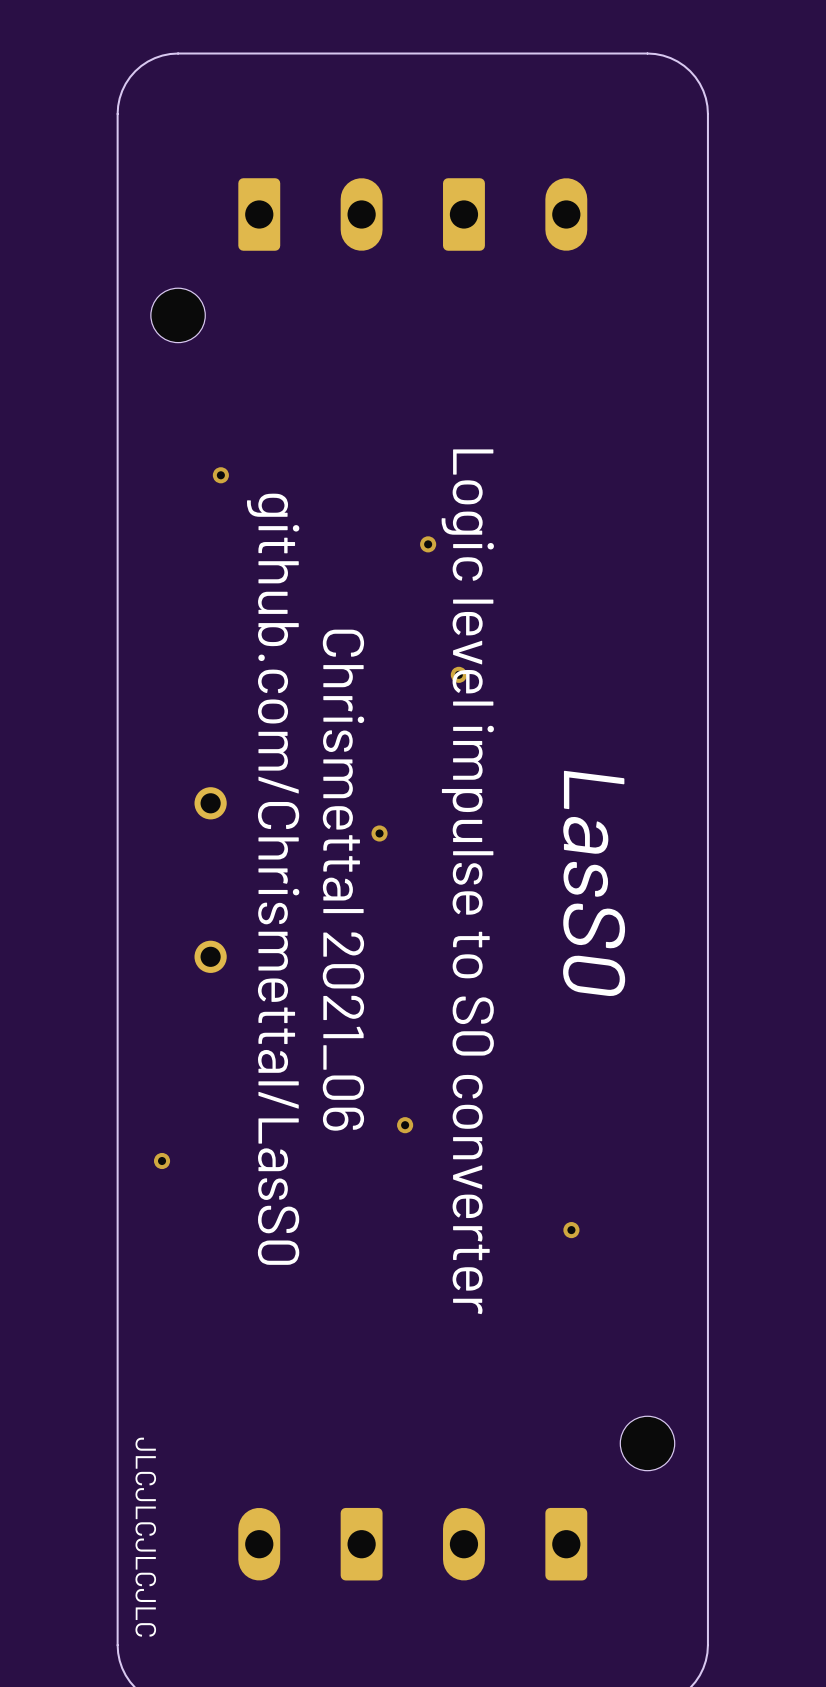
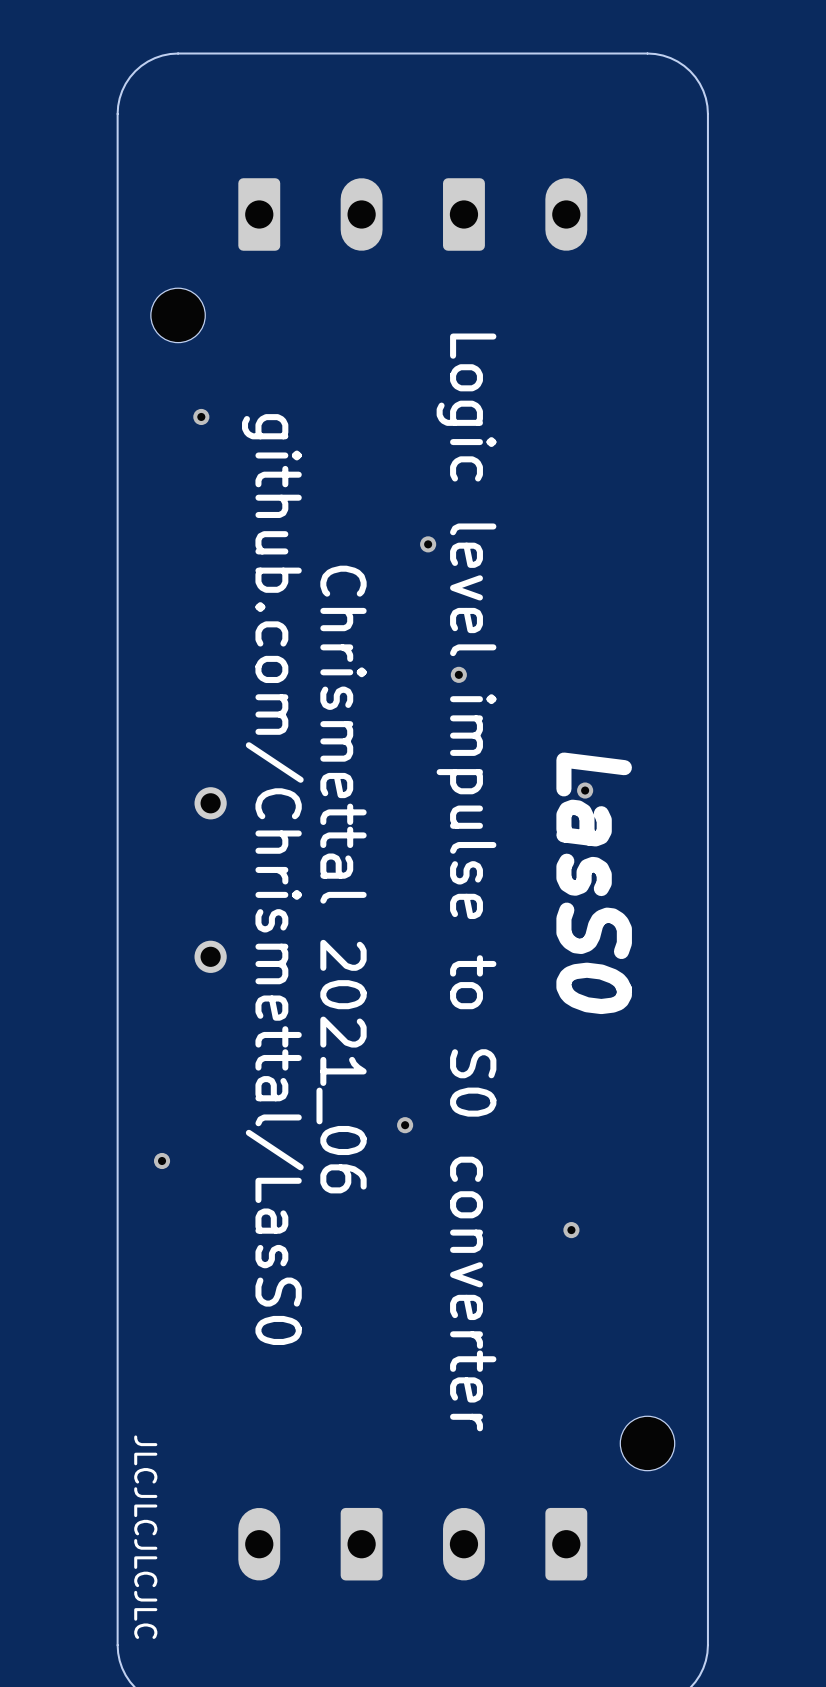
via position: (220, 475) -> (201, 416)
via: none -> (585, 790)
via: (379, 833) -> none

